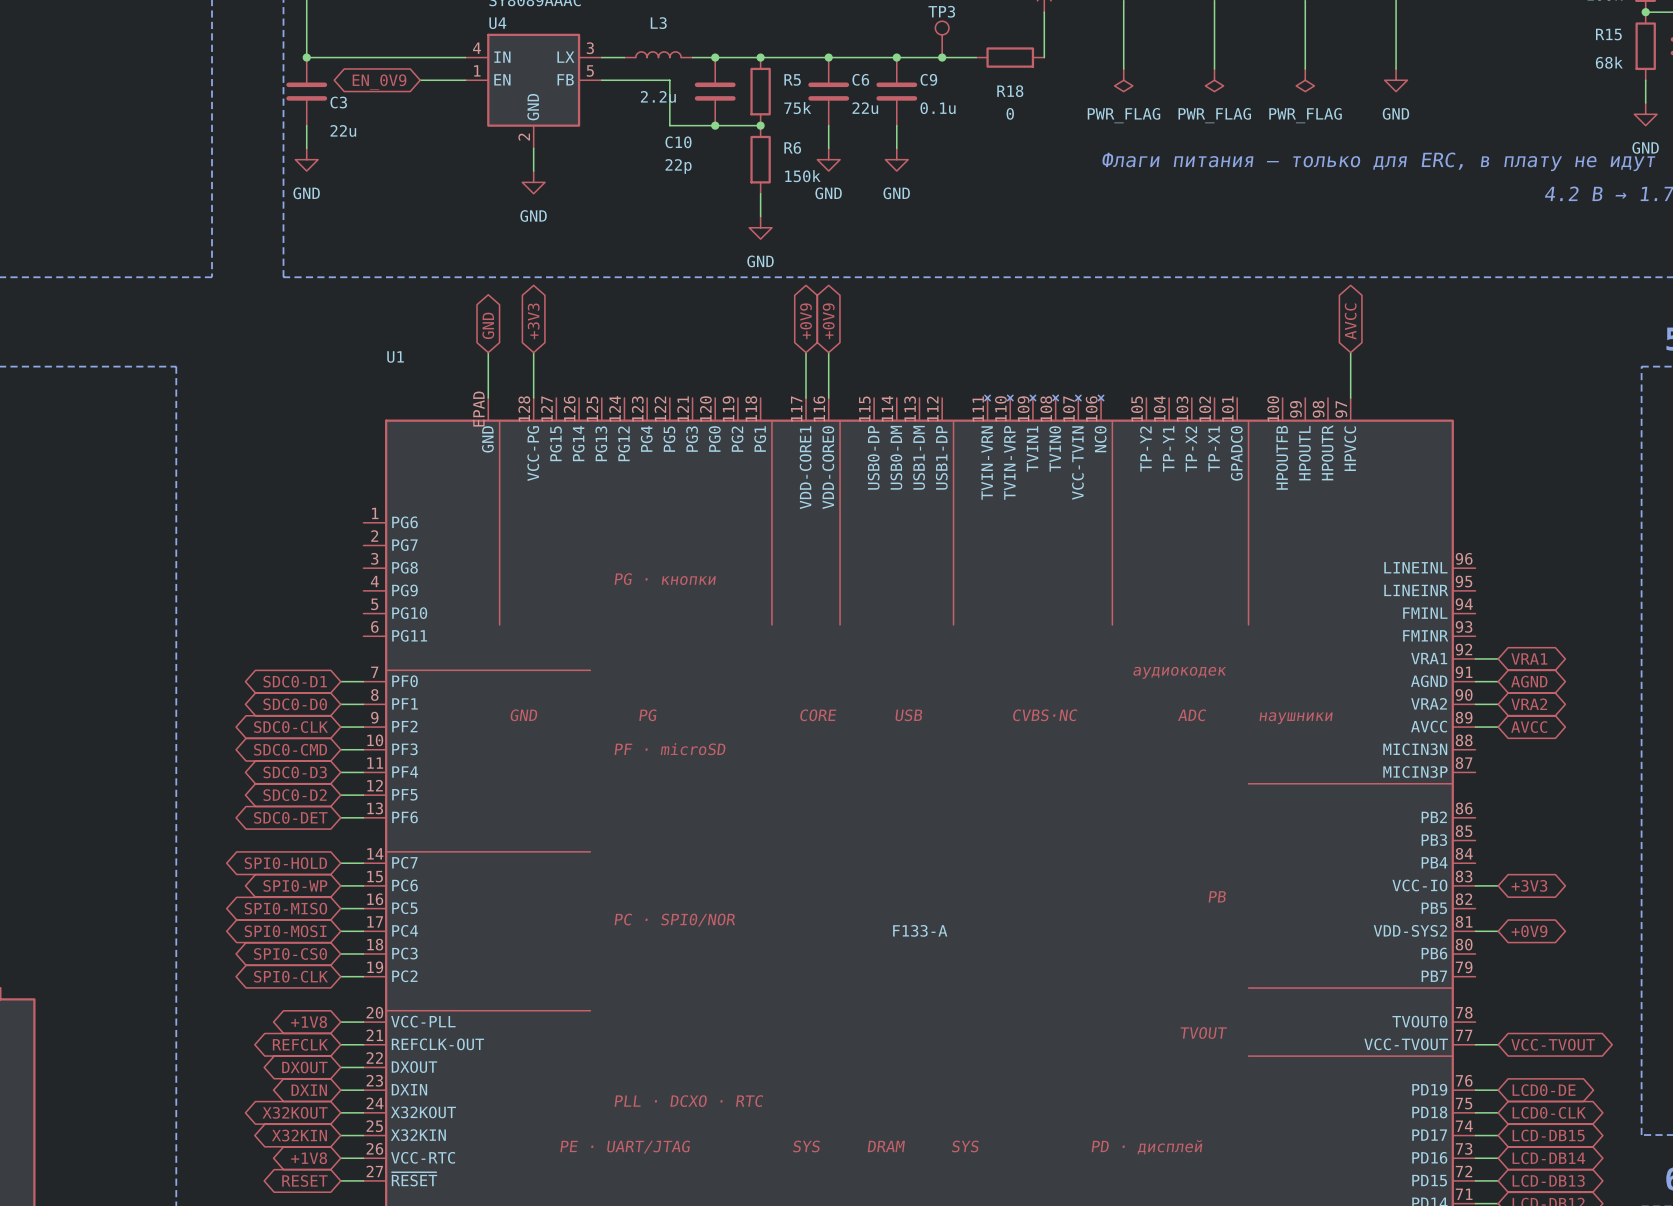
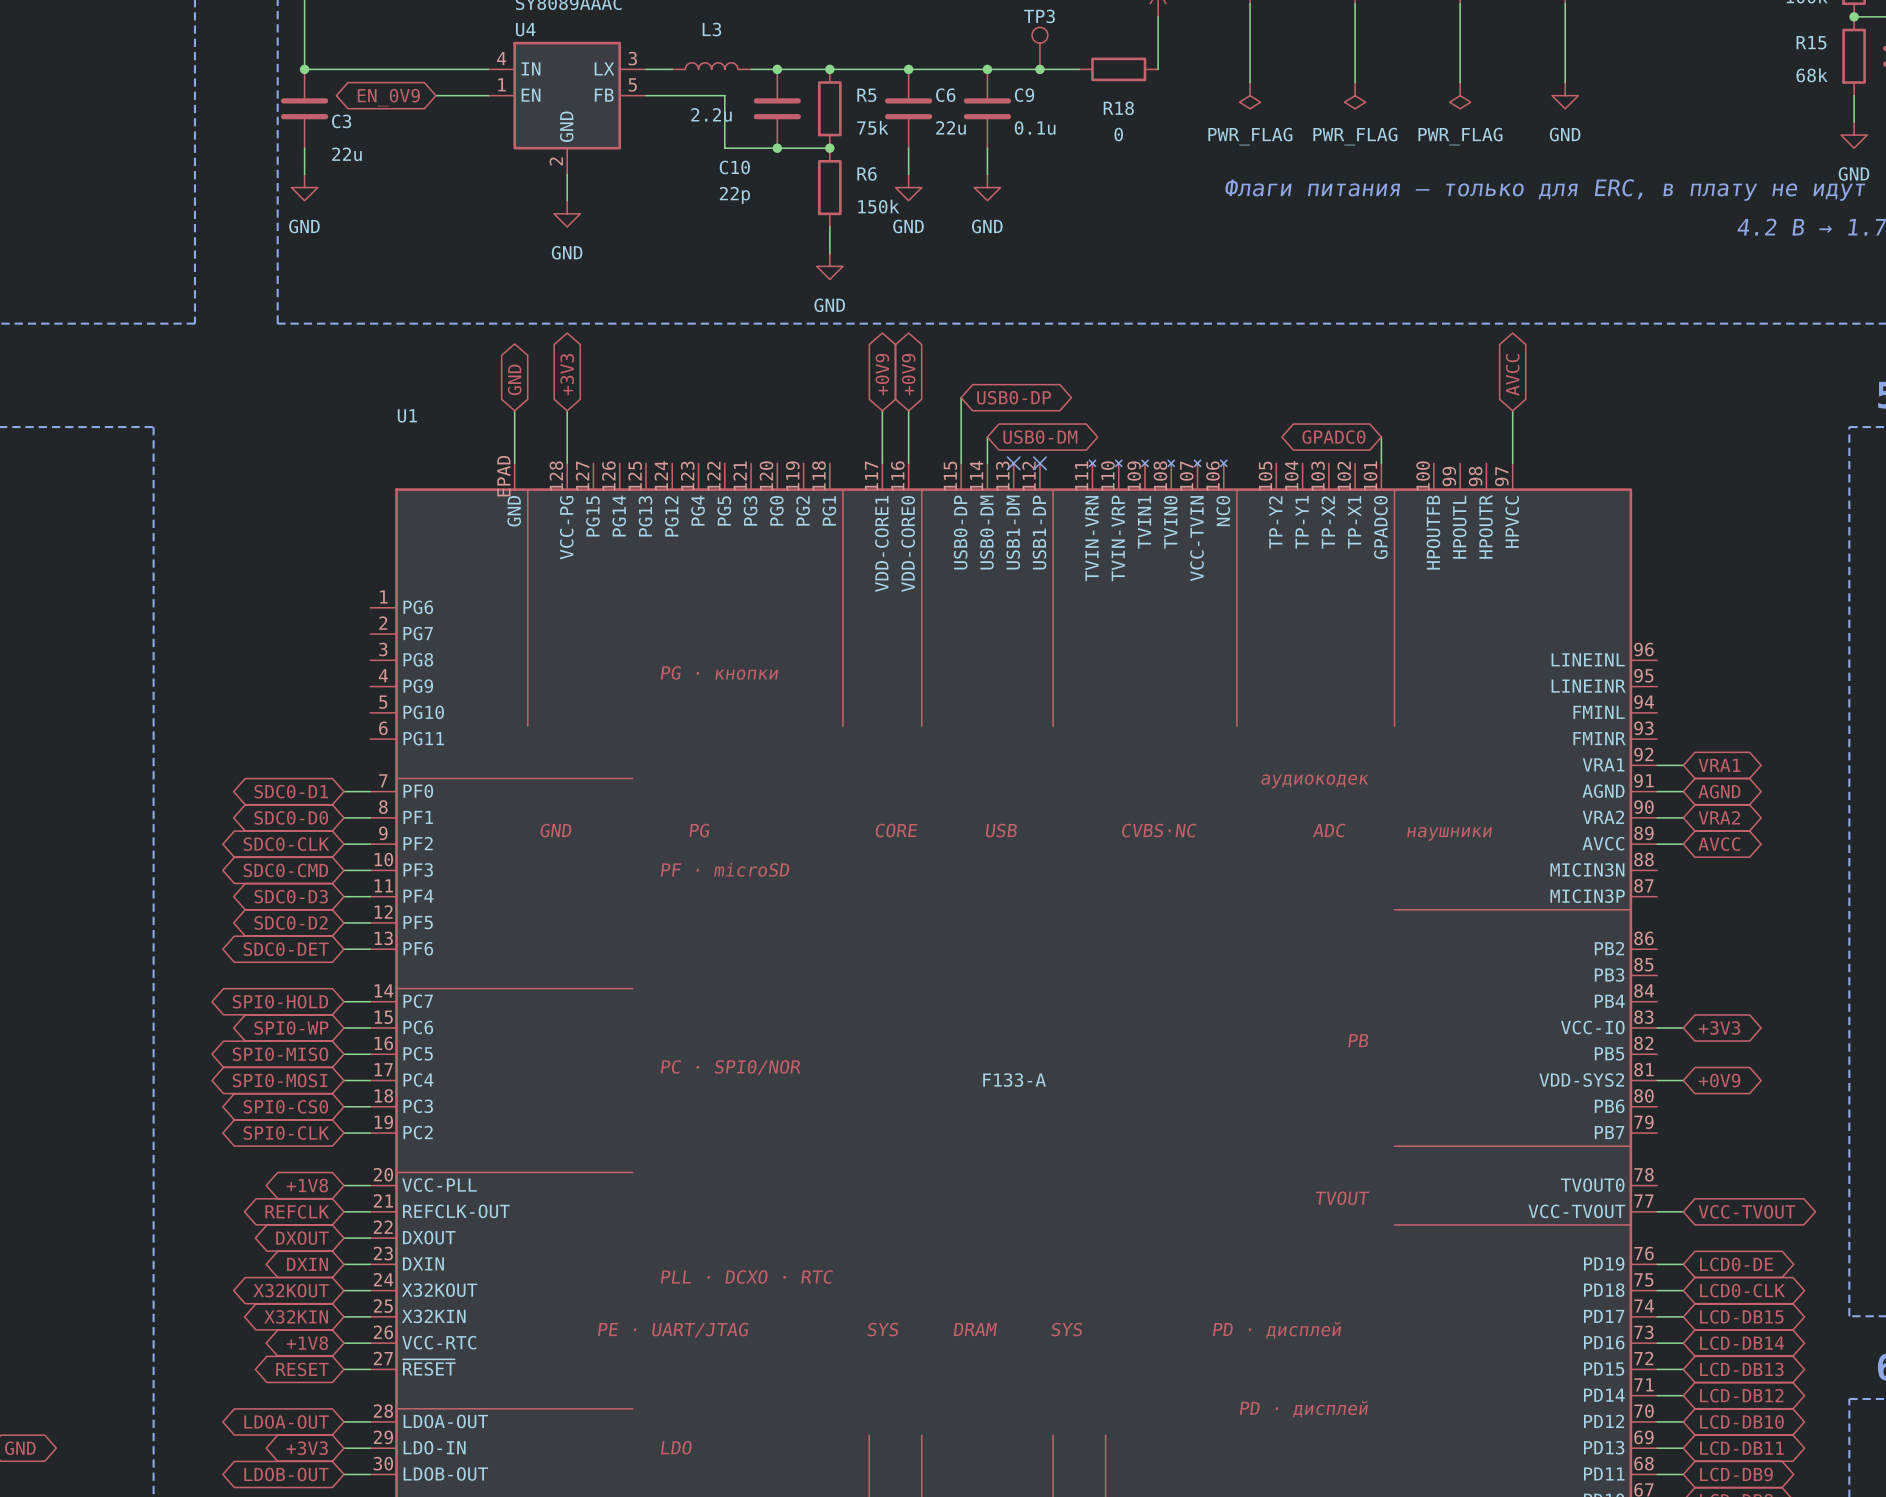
wire: none -> (961, 397) (961, 463)
global label: none -> USB0-DP (1014, 397)
wire: none -> (987, 437) (987, 463)
global label: none -> USB0-DM (1040, 437)
global label: none -> GPADC0 (1333, 437)
wire: none -> (1381, 437) (1381, 463)
no-connect mark: none -> (1013, 463)
no-connect mark: none -> (1039, 463)

